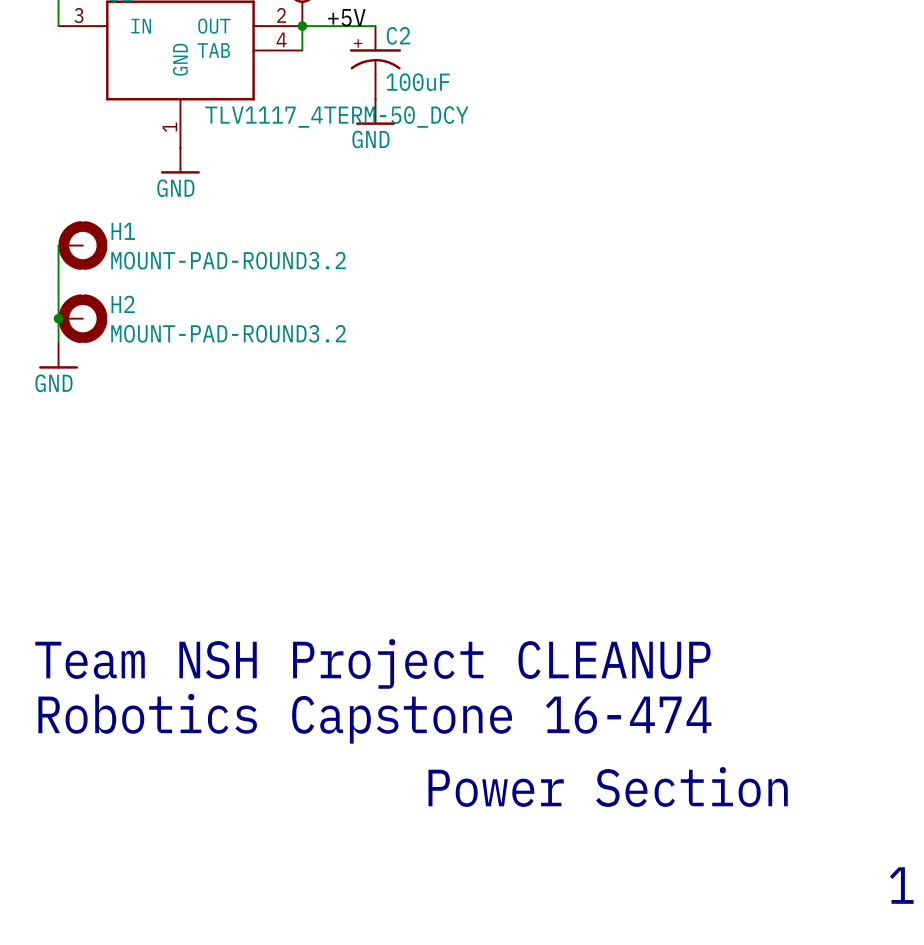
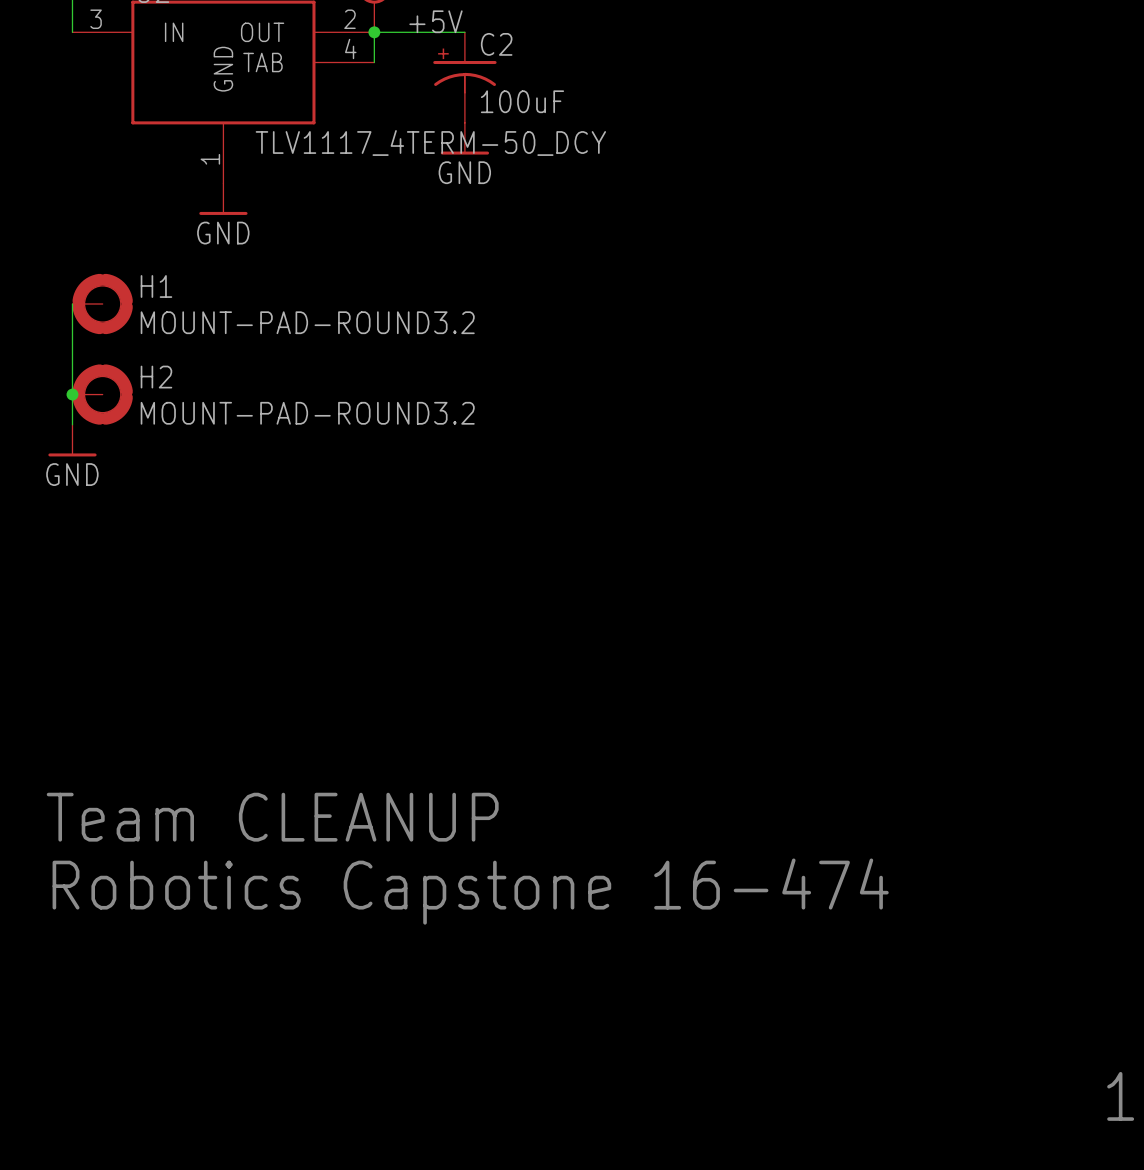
text: Team NSH Project CLEANUP (372, 663) -> Team CLEANUP (272, 817)
text: Power Section (608, 787) -> none

